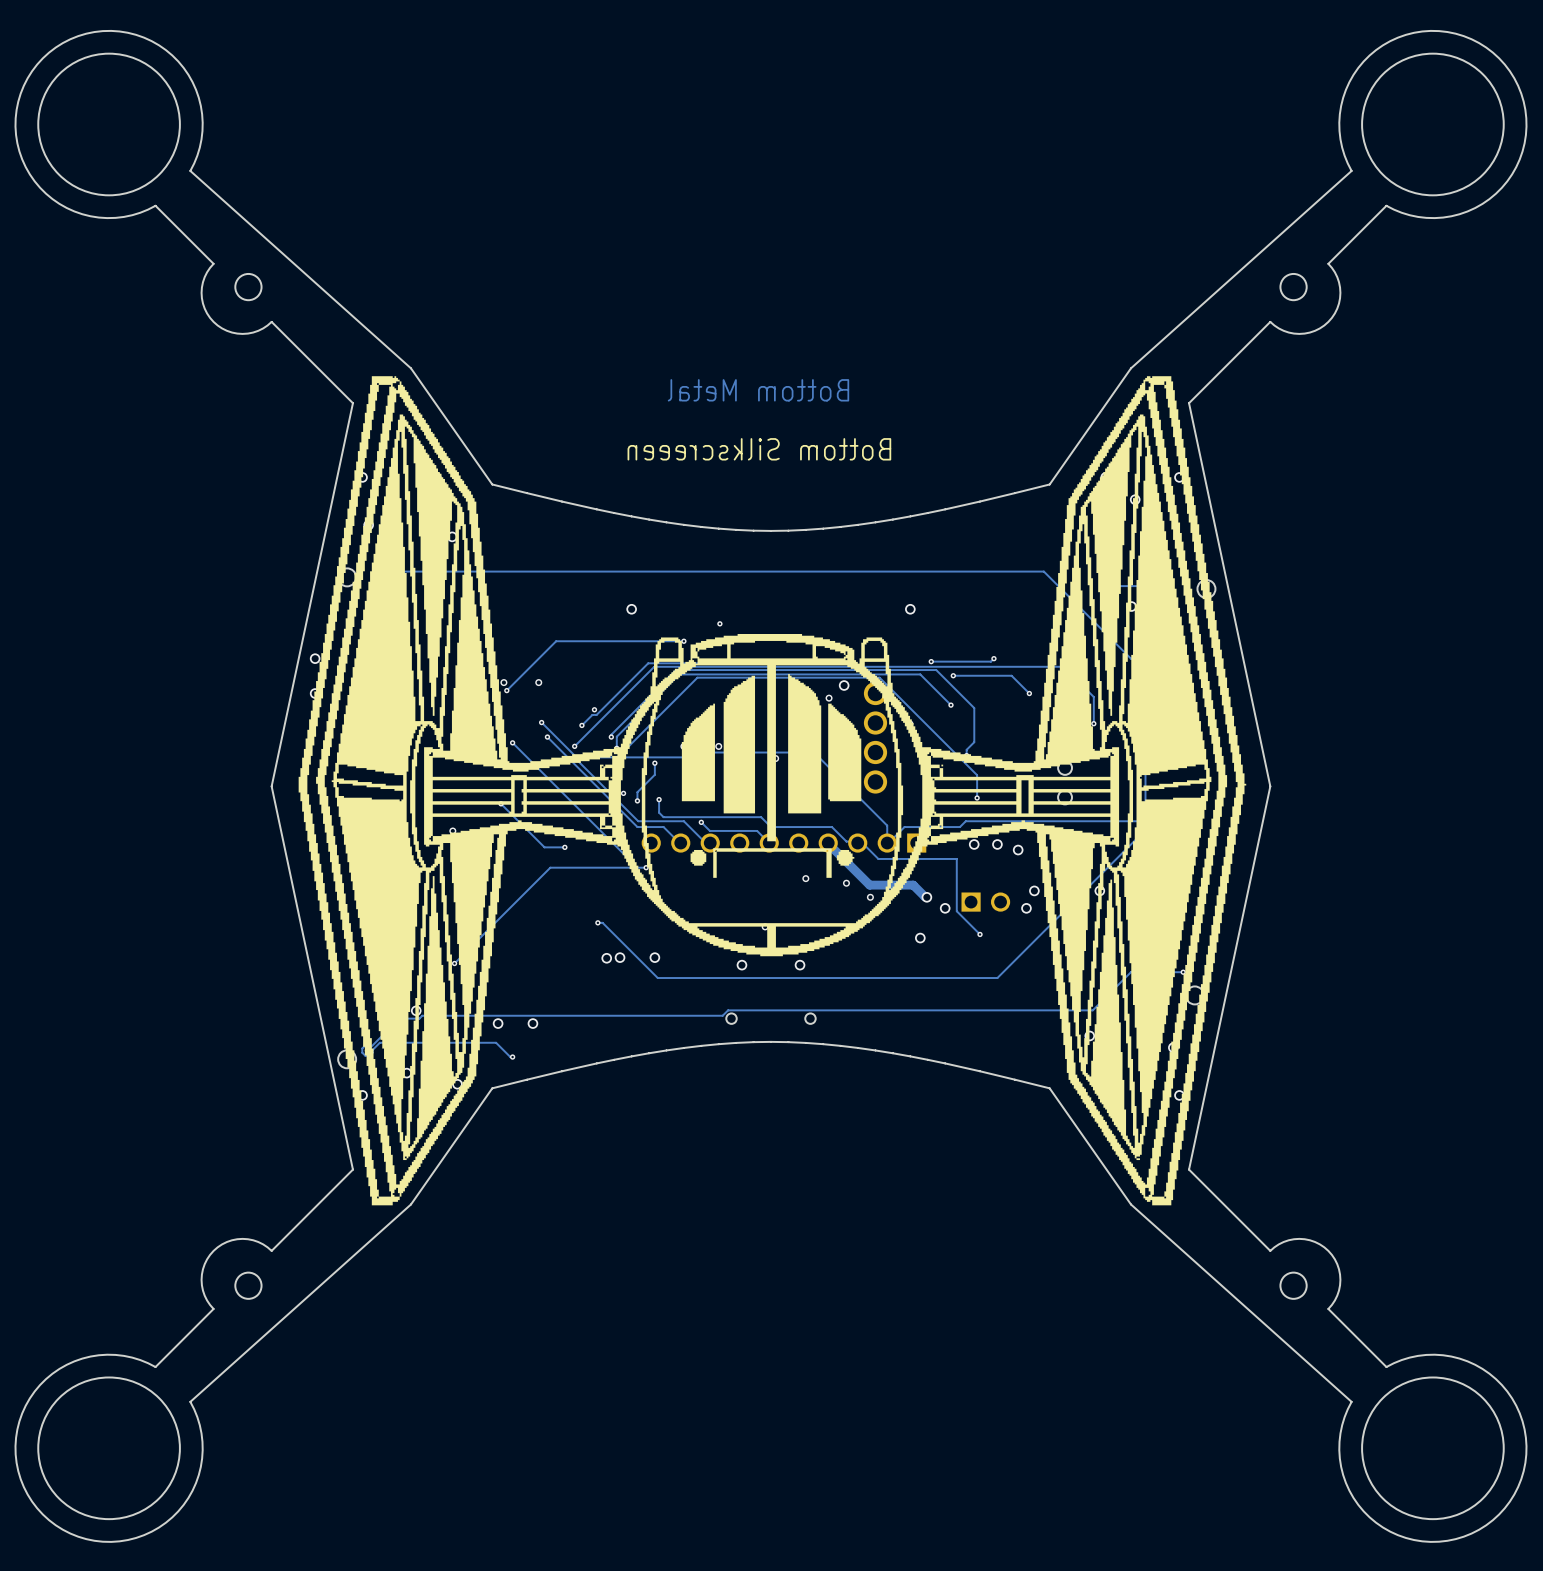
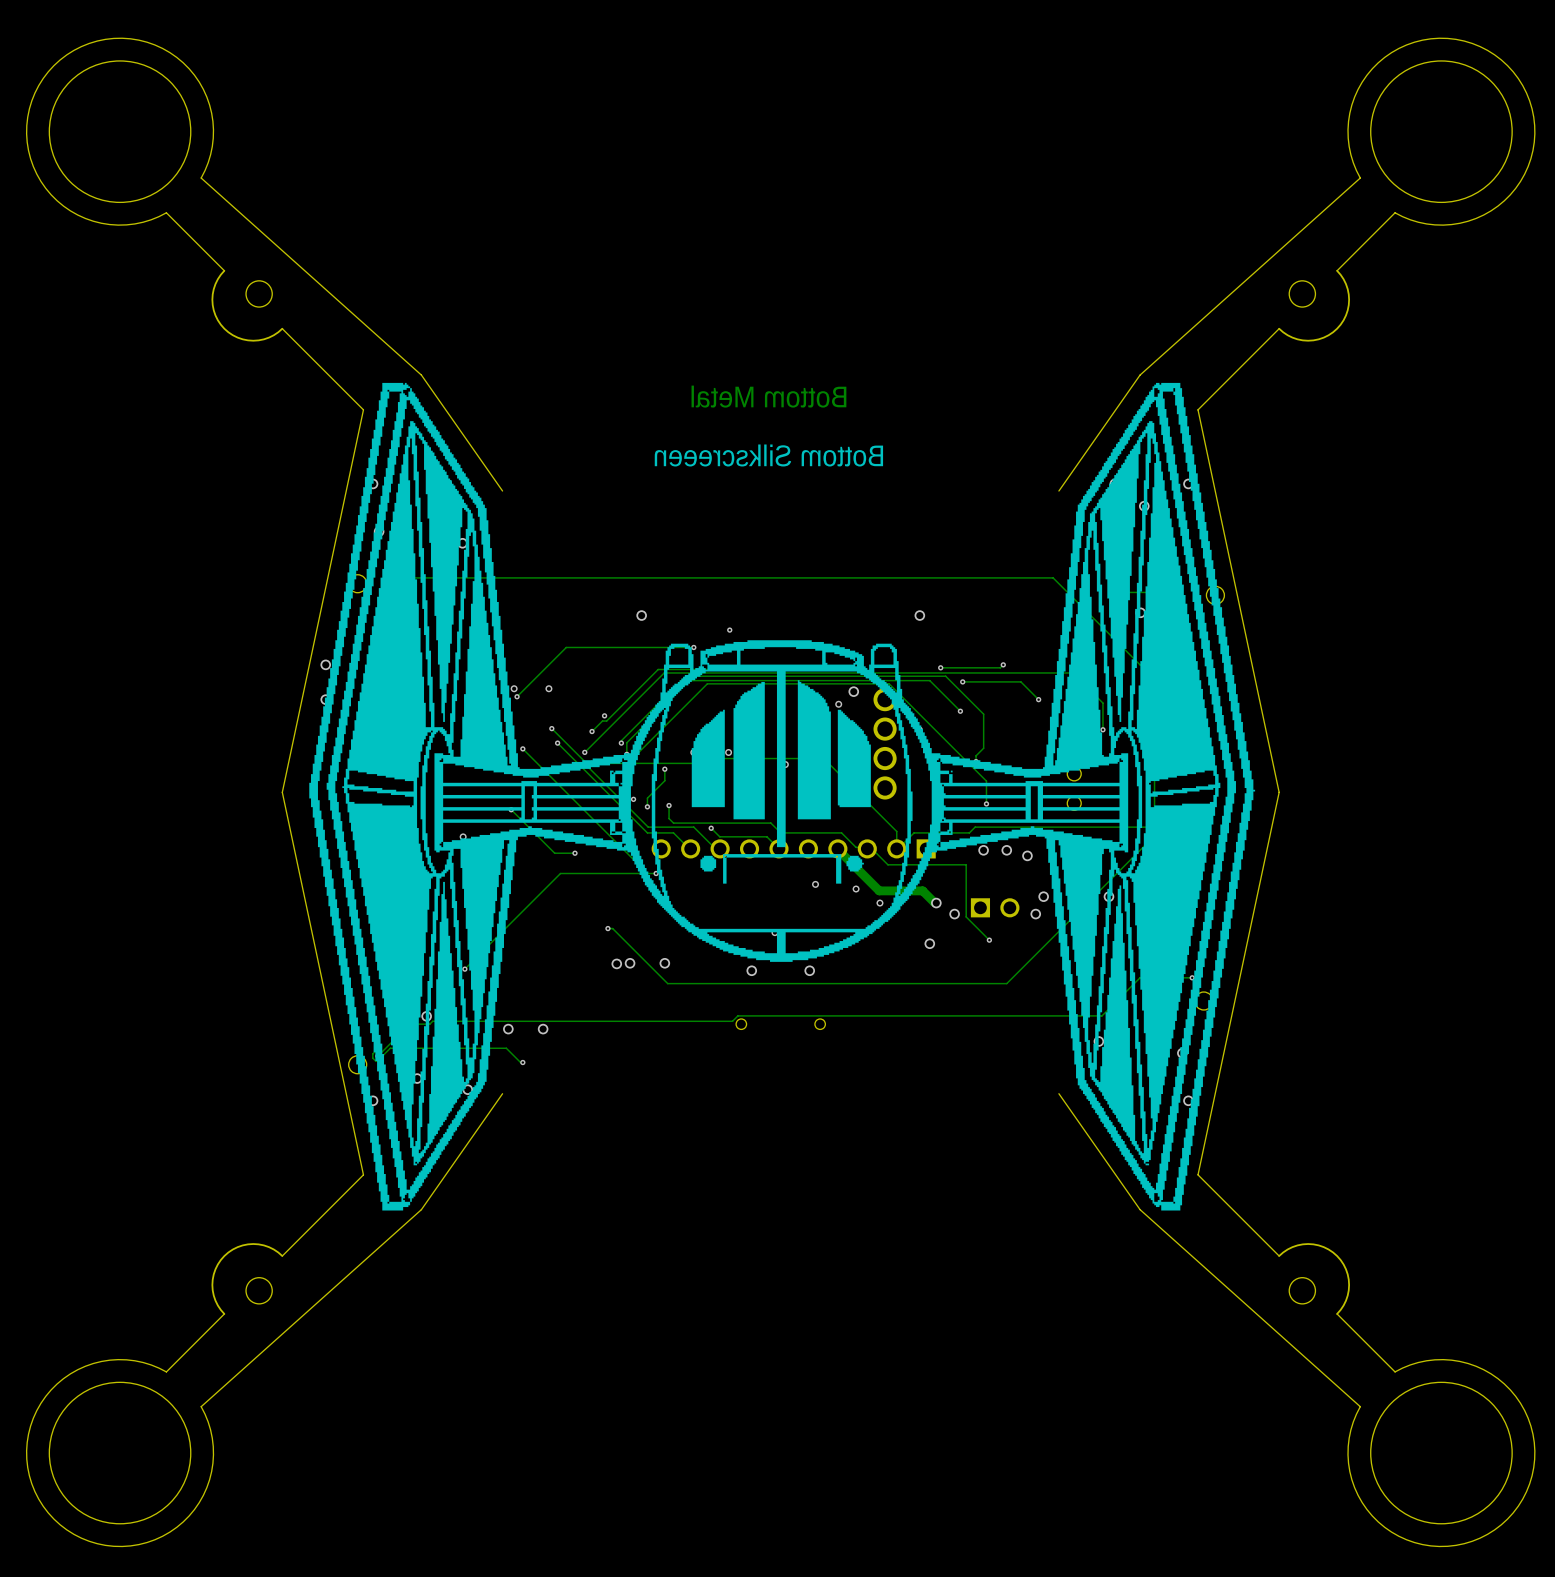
board edge: (1049, 484) (892, 519) (823, 528) (770, 530) (718, 528) (649, 519) (492, 484) -> none
board edge: (1049, 1088) (892, 1053) (823, 1044) (770, 1041) (718, 1044) (649, 1053) (492, 1088) -> none

